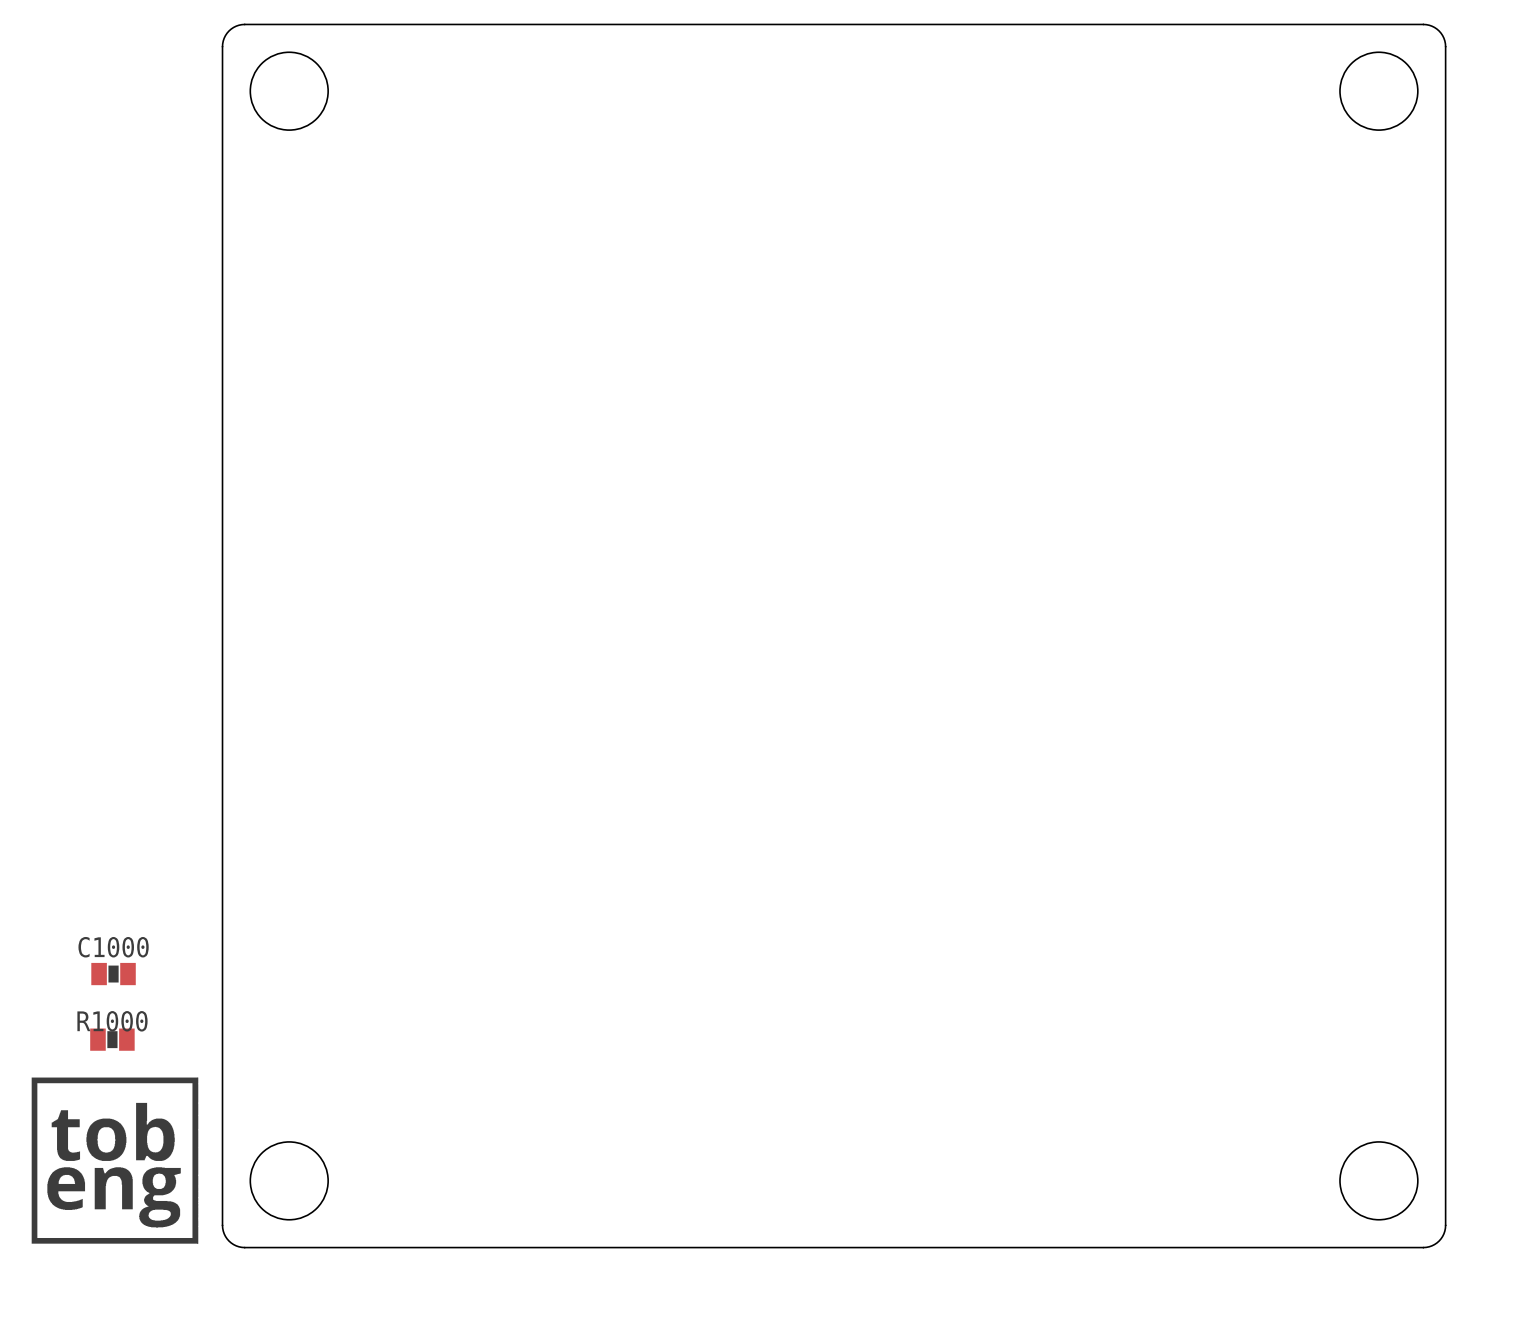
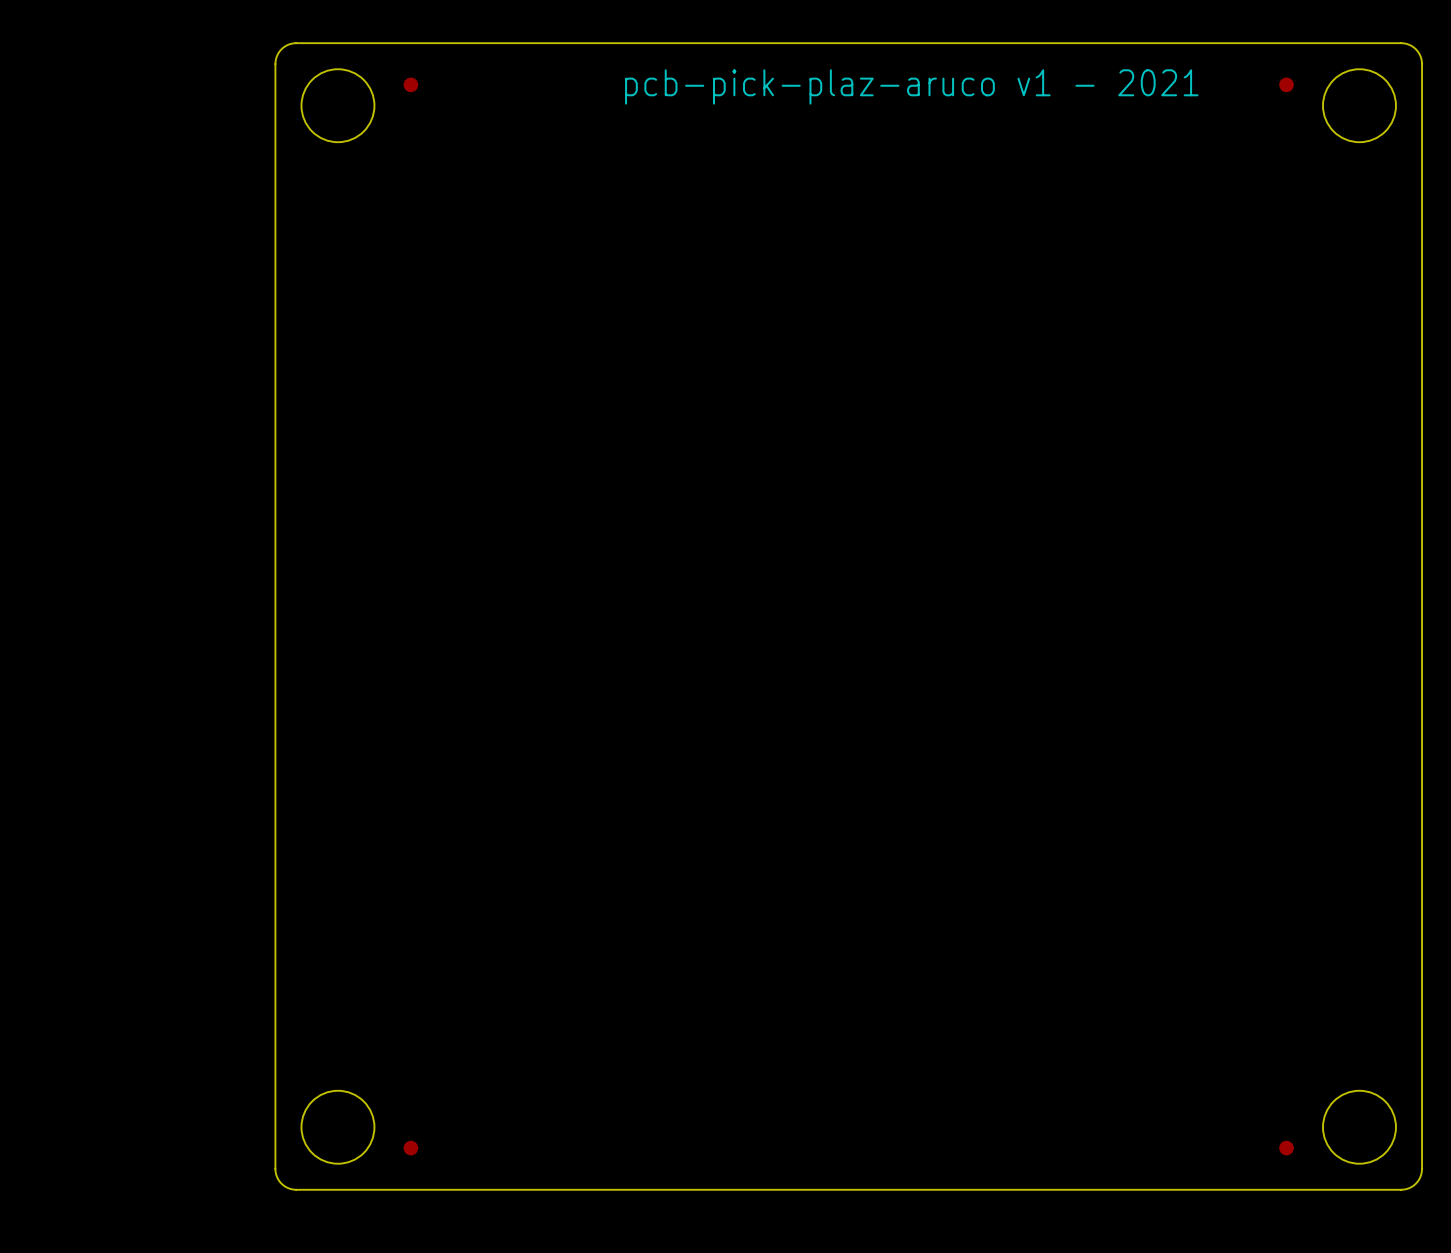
part: none -> (410, 84)
part: none -> (1286, 84)
text: none -> pcb-pick-plaz-aruco v1 - 2021 (911, 86)
C1000: (113, 974) -> none
R1000: (112, 1039) -> none
drawing: [31, 1077, 199, 1245] -> none
part: none -> (410, 1148)
part: none -> (1286, 1148)

